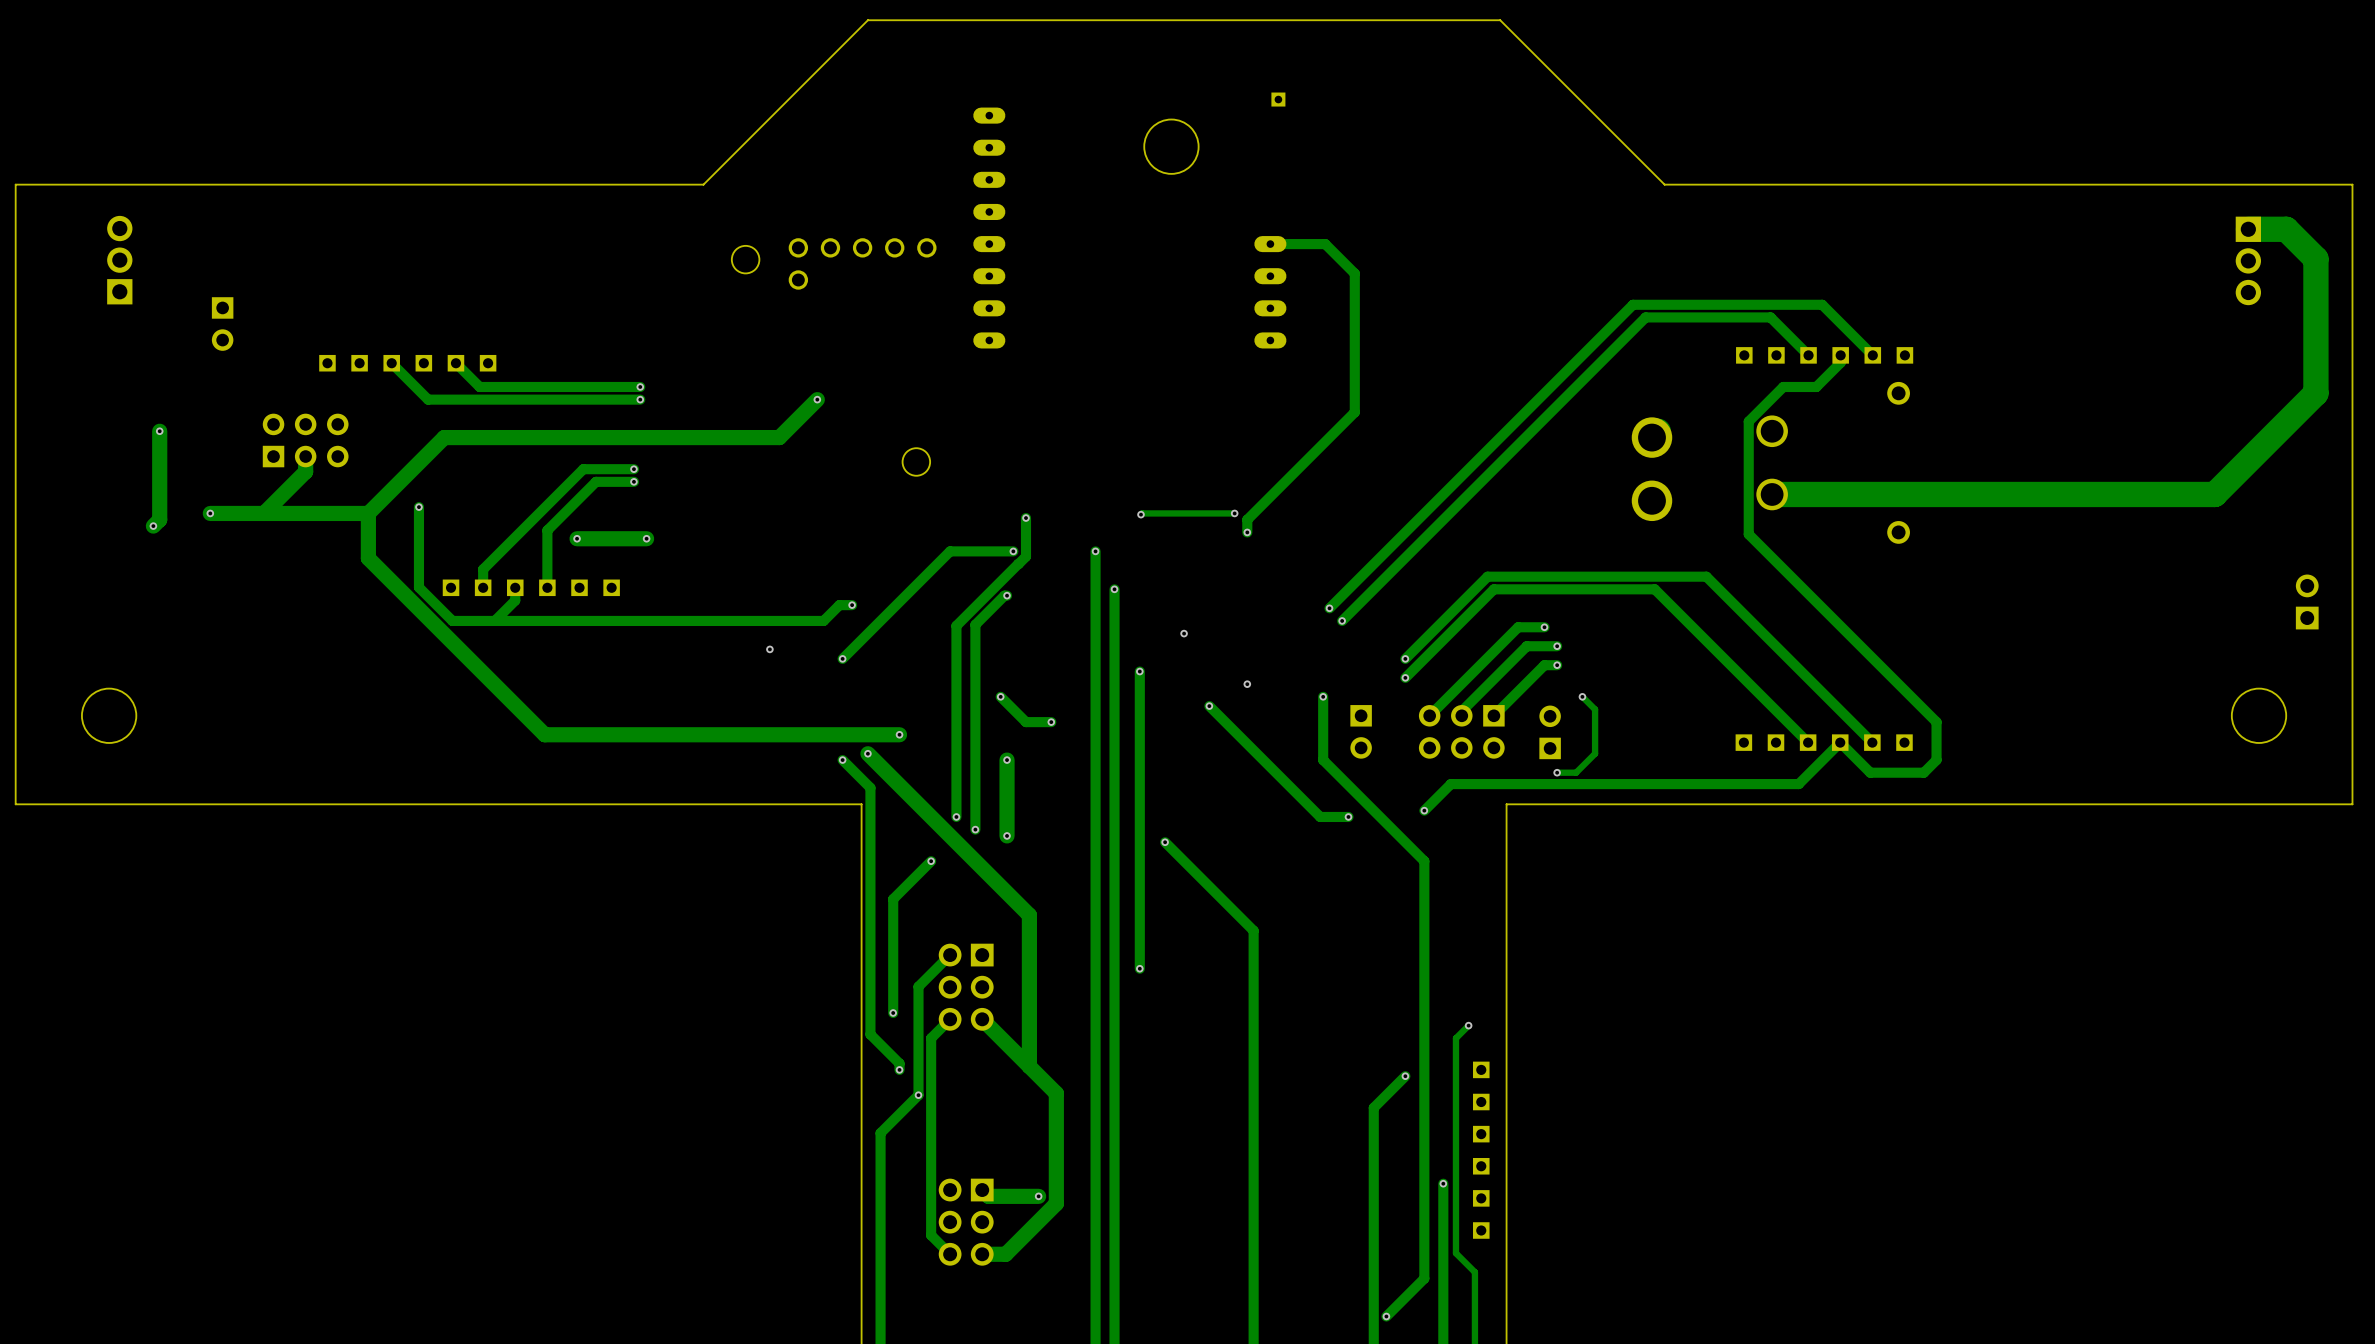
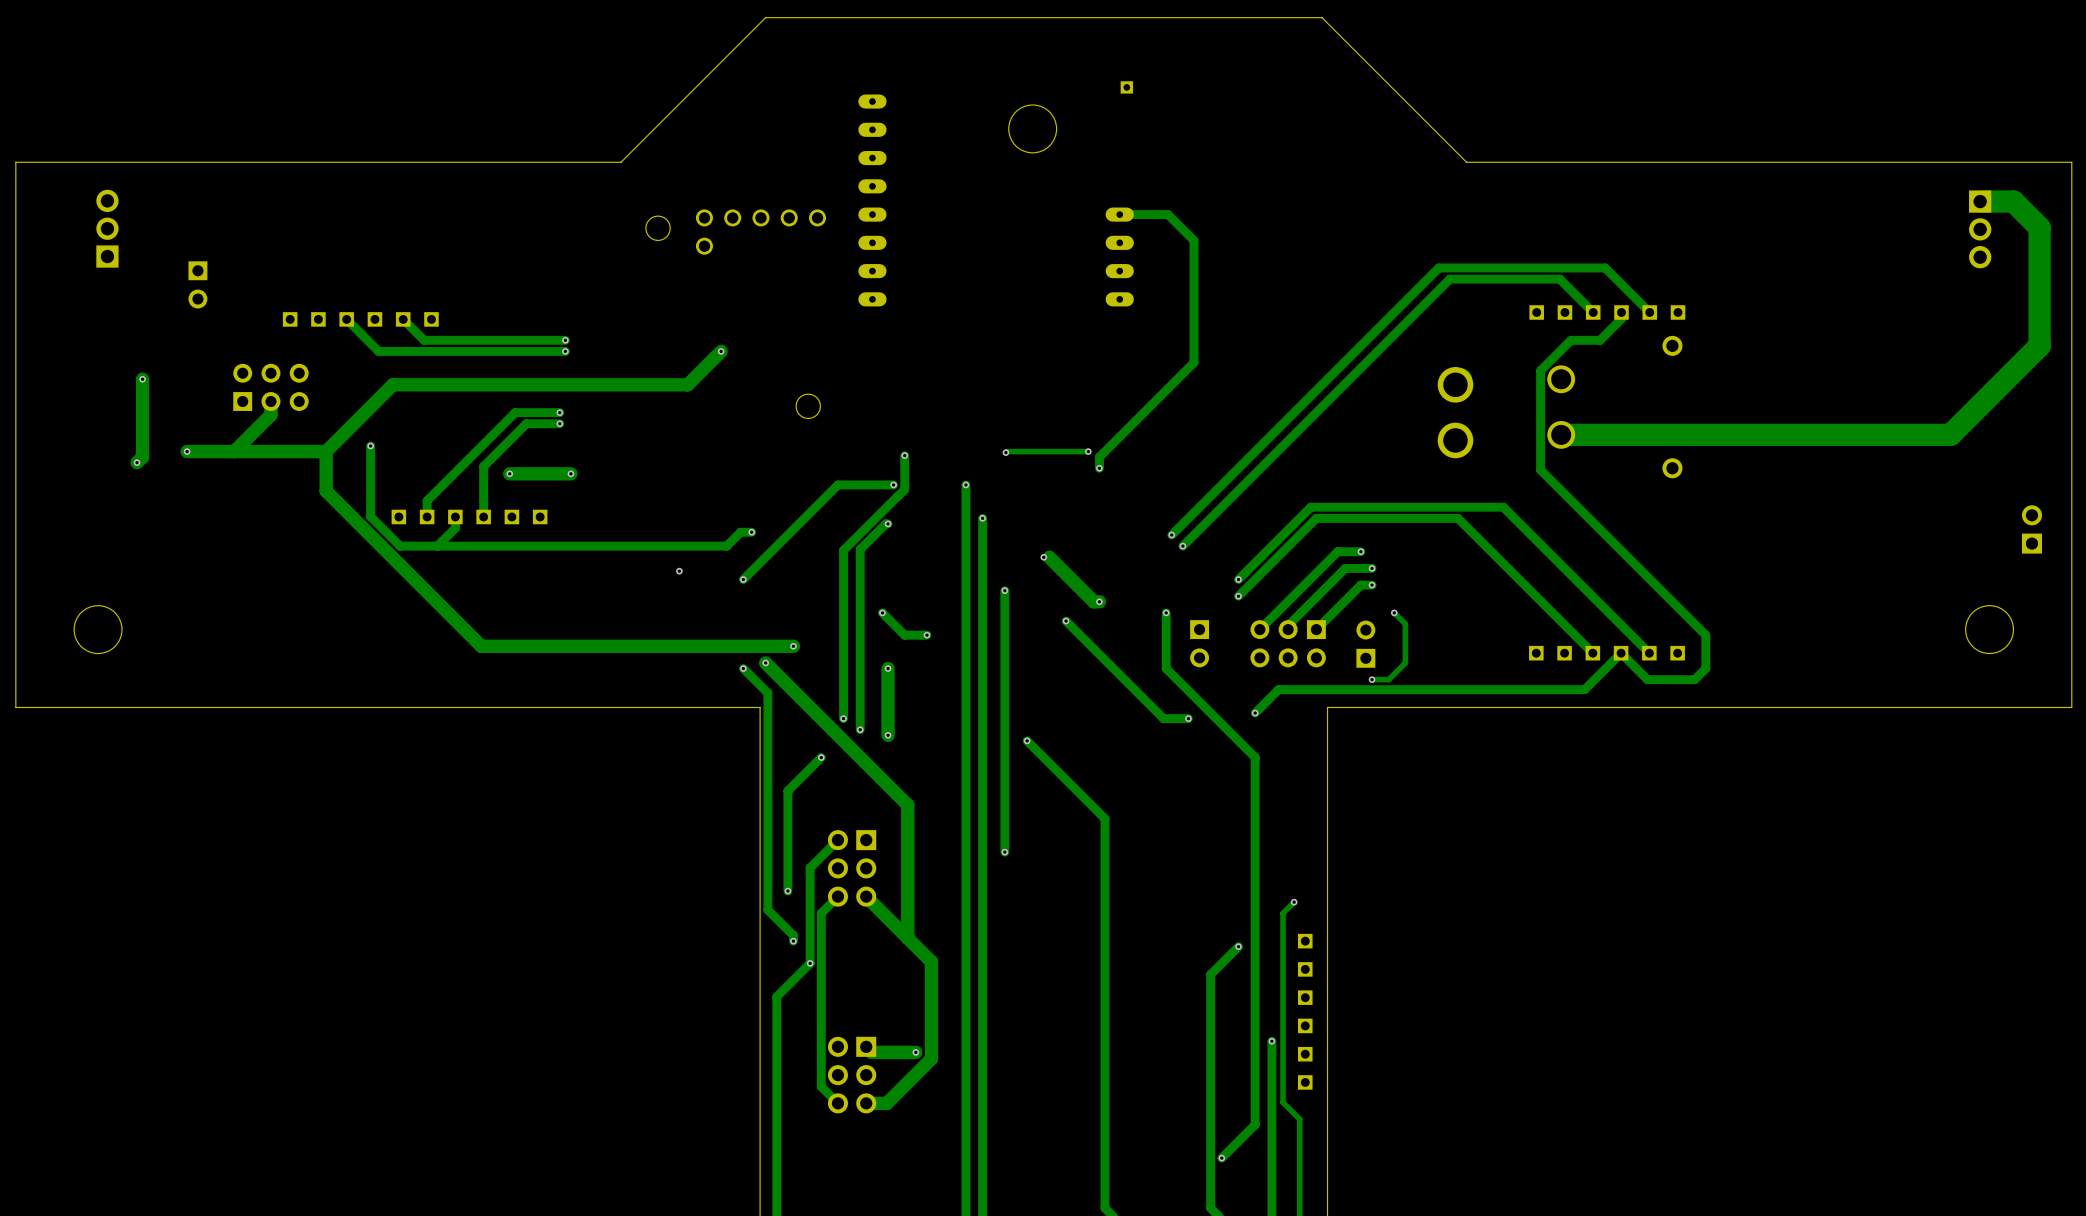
track: none -> (1049, 557) (1093, 601) (1099, 601)

